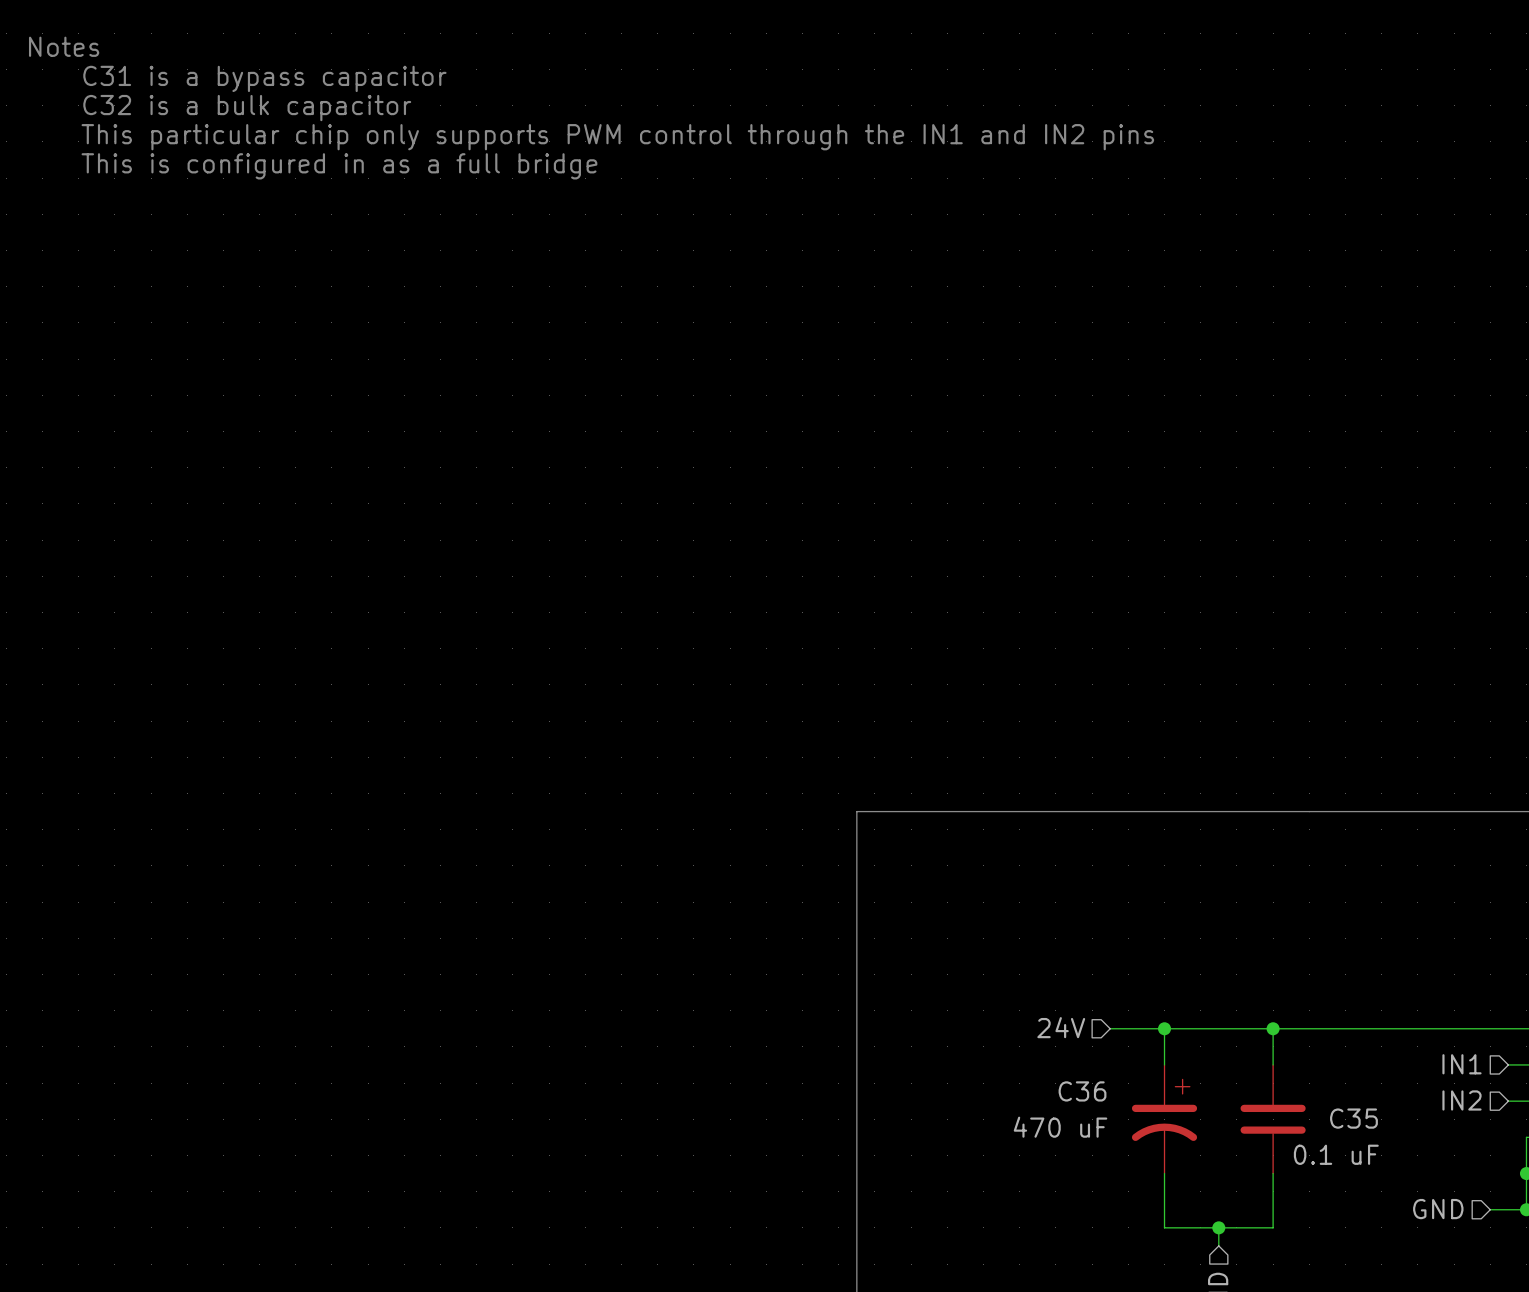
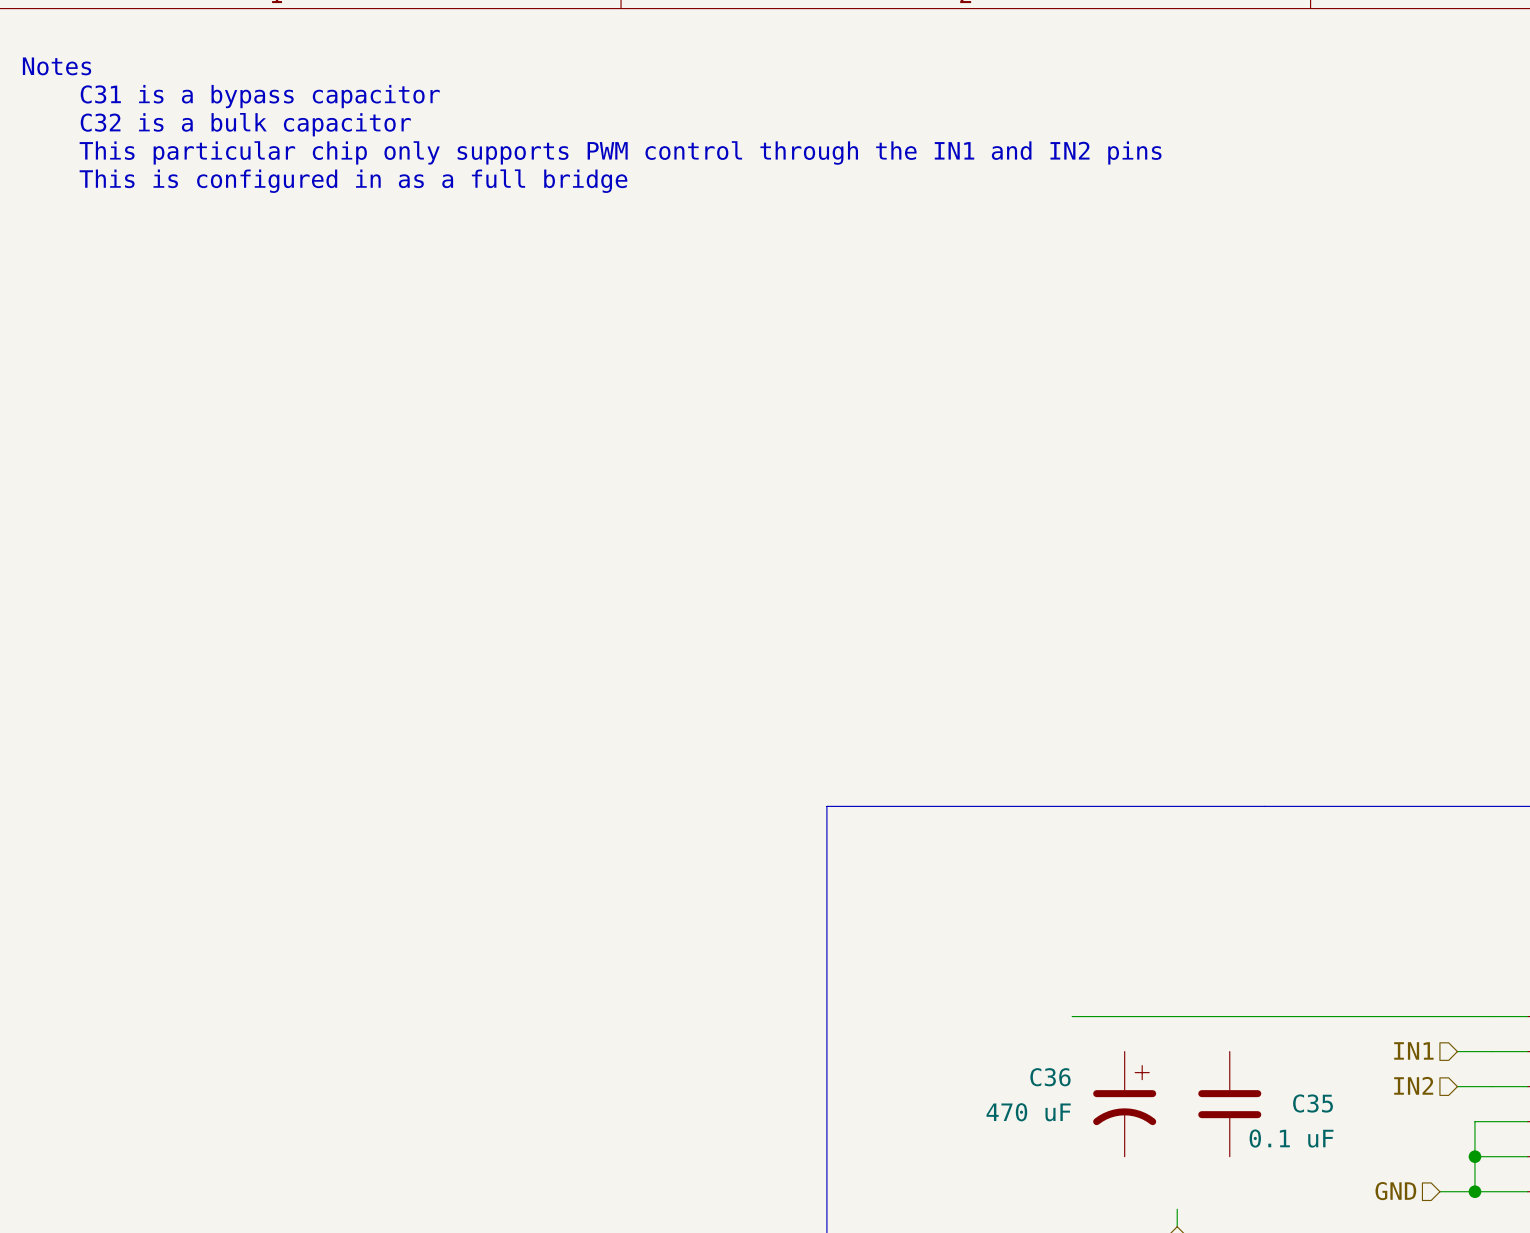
hierarchical label: 24V (1061, 1027) -> none
wire: (1164, 1028) (1164, 1064) -> none
junction: (1164, 1028) -> none
wire: (1273, 1028) (1273, 1064) -> none
junction: (1273, 1028) -> none
wire: (1164, 1173) (1164, 1227) (1273, 1227) (1273, 1173) -> none
junction: (1218, 1227) -> none

